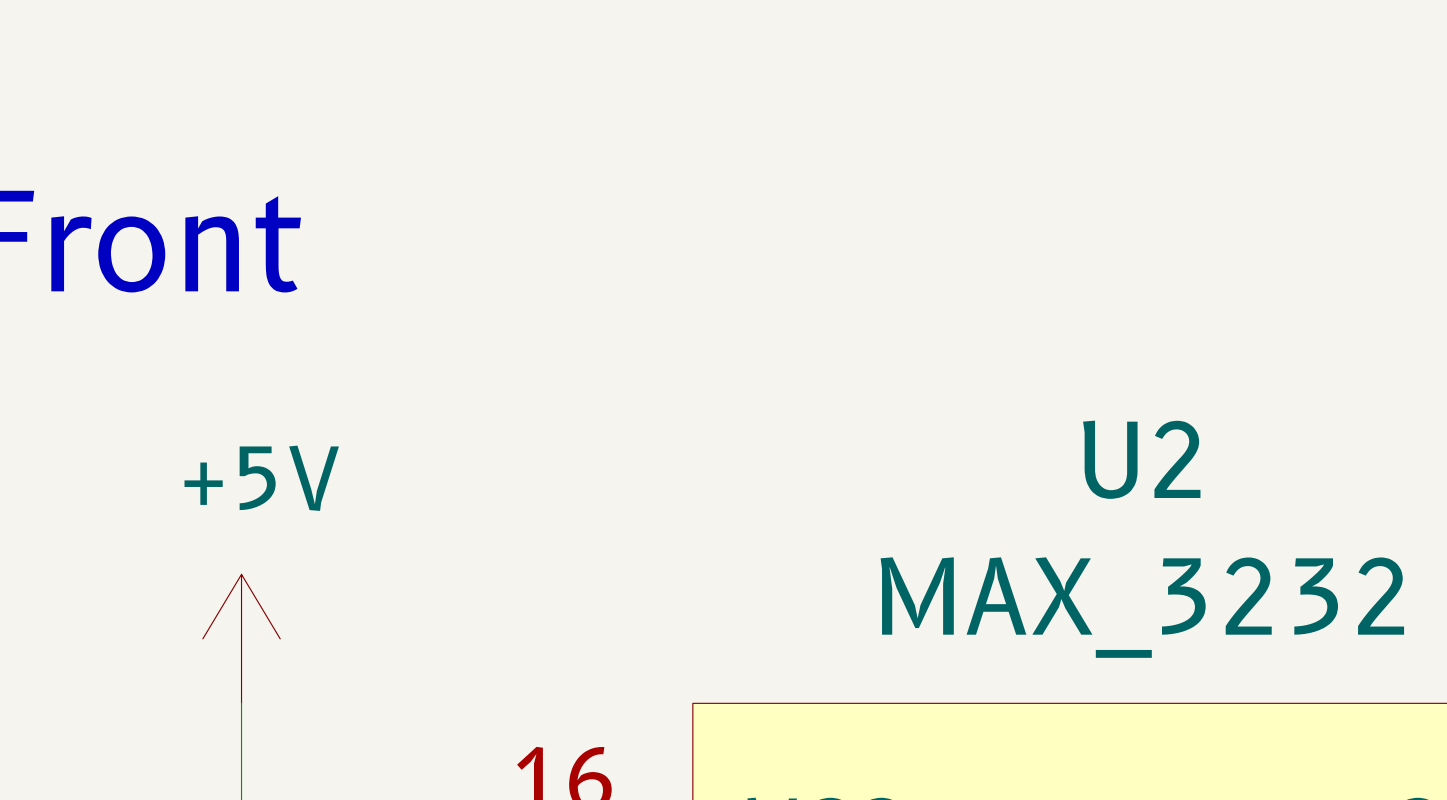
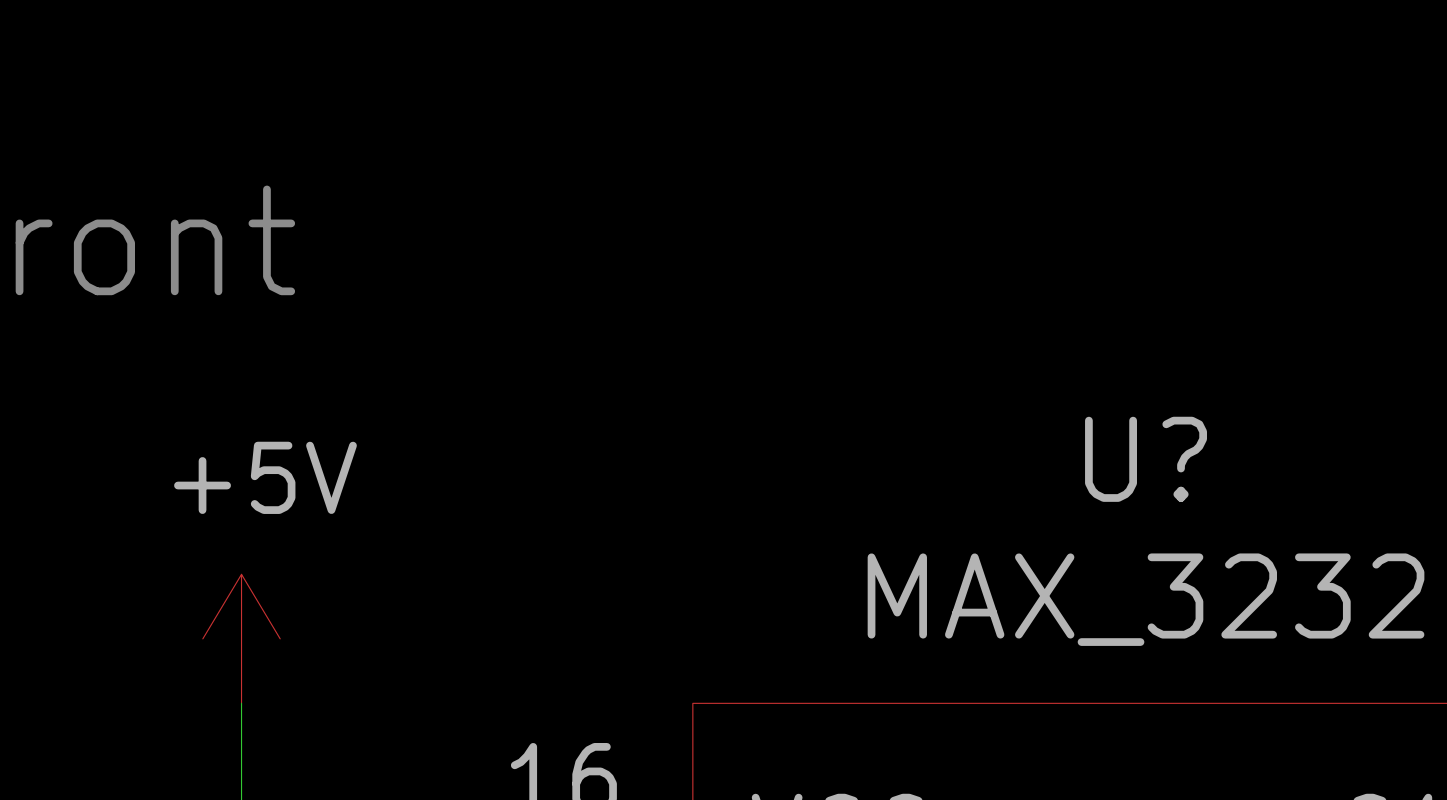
U2 name: U2 (1141, 459) -> U? (1146, 459)

